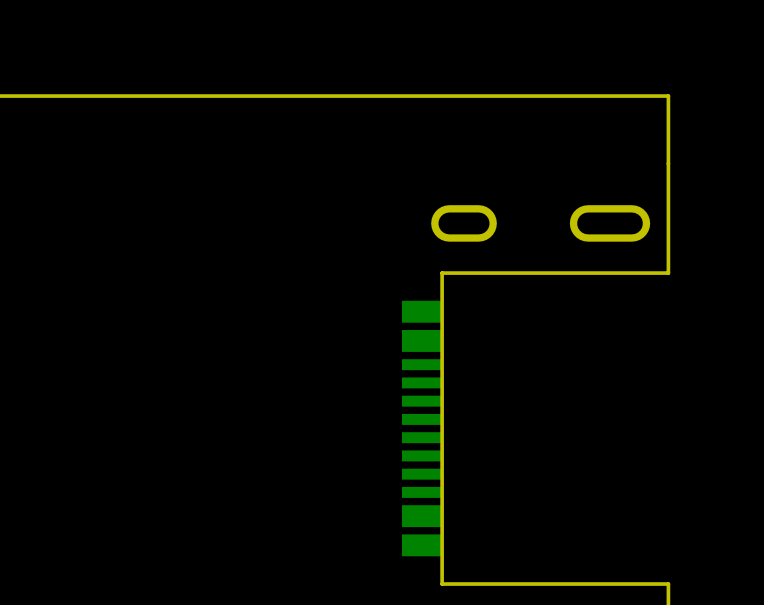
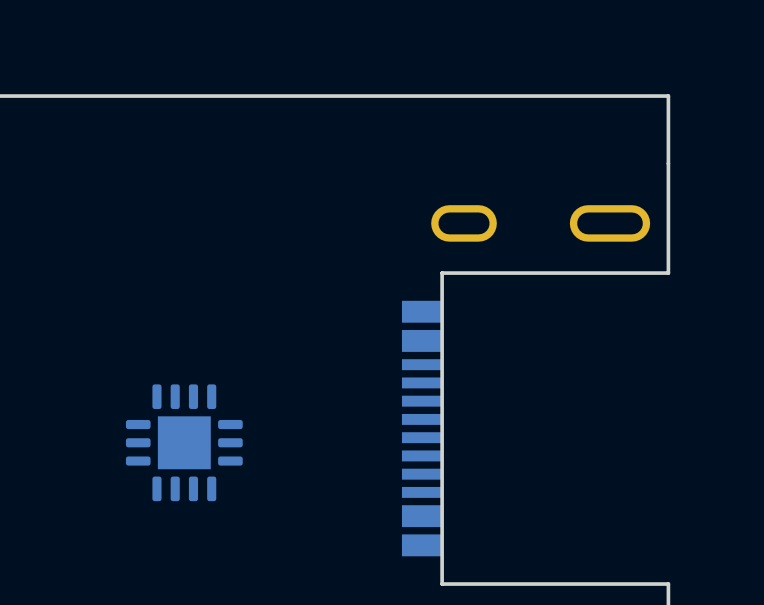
part: none -> (184, 442)

